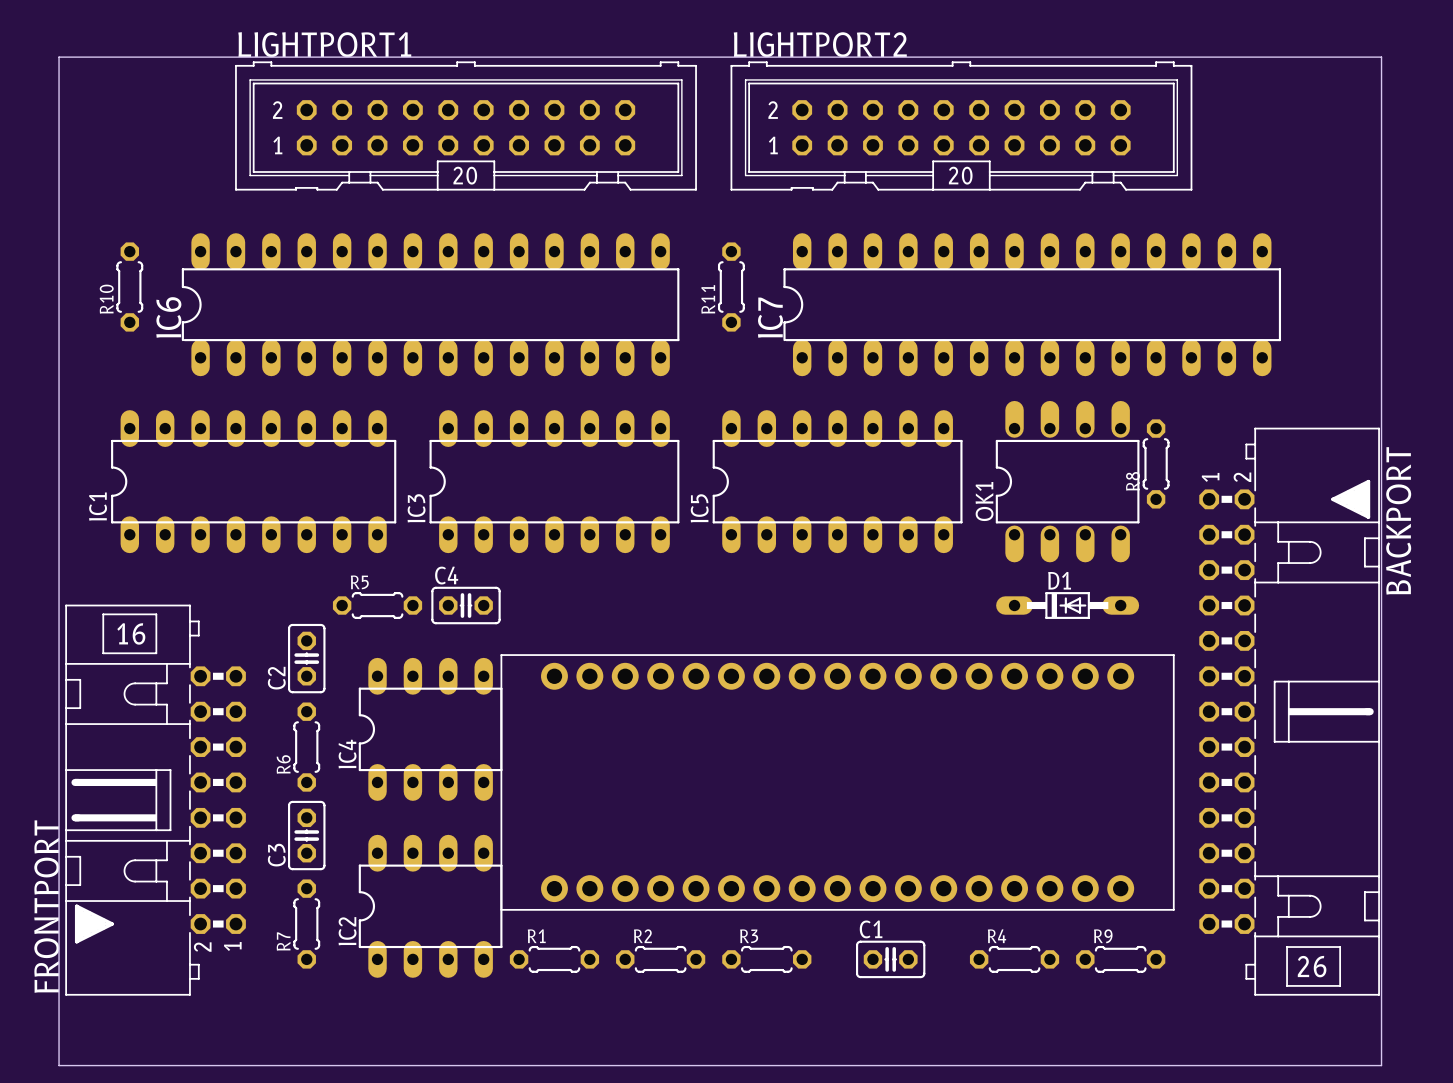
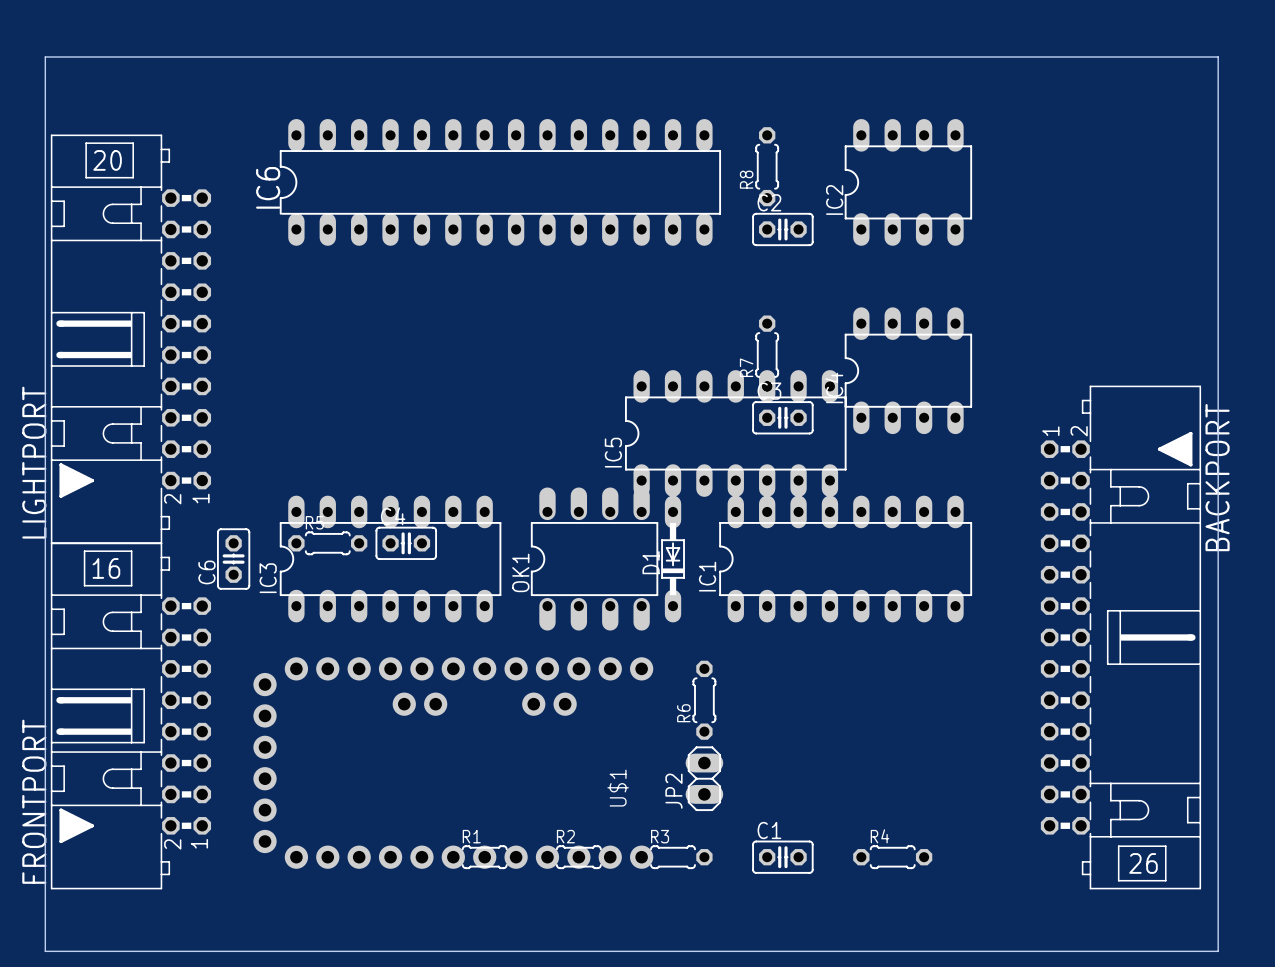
LIGHTPORT1: (466, 125) -> none
LIGHTPORT2: (961, 125) -> none
R10: (129, 287) -> none
R11: (731, 287) -> none
IC6 position: (430, 304) -> (500, 182)
IC7: (1032, 304) -> none
LIGHTPORT: none -> (130, 339)
R8 position: (1156, 463) -> (767, 166)
IC1 position: (253, 481) -> (845, 559)
IC3 position: (554, 481) -> (390, 559)
OK1 position: (1067, 481) -> (594, 559)
D1 rotation: 0° (1067, 605) -> 90° counterclockwise (673, 559)
D1 position: (1067, 605) -> (673, 559)
C6: none -> (233, 559)
C2 rotation: 0° (306, 658) -> 90° clockwise (782, 229)
C2 position: (306, 658) -> (782, 229)
BACKPORT position: (1289, 711) -> (1120, 637)
IC4 position: (430, 729) -> (908, 370)
R6 position: (306, 747) -> (704, 700)
part: (837, 782) -> none
C3 rotation: 0° (306, 835) -> 90° clockwise (782, 417)
C3 position: (306, 835) -> (782, 417)
U$1: none -> (453, 763)
JP2: none -> (704, 778)
IC2 position: (430, 906) -> (908, 182)
R7 position: (306, 924) -> (767, 355)
R9: (1120, 959) -> none

